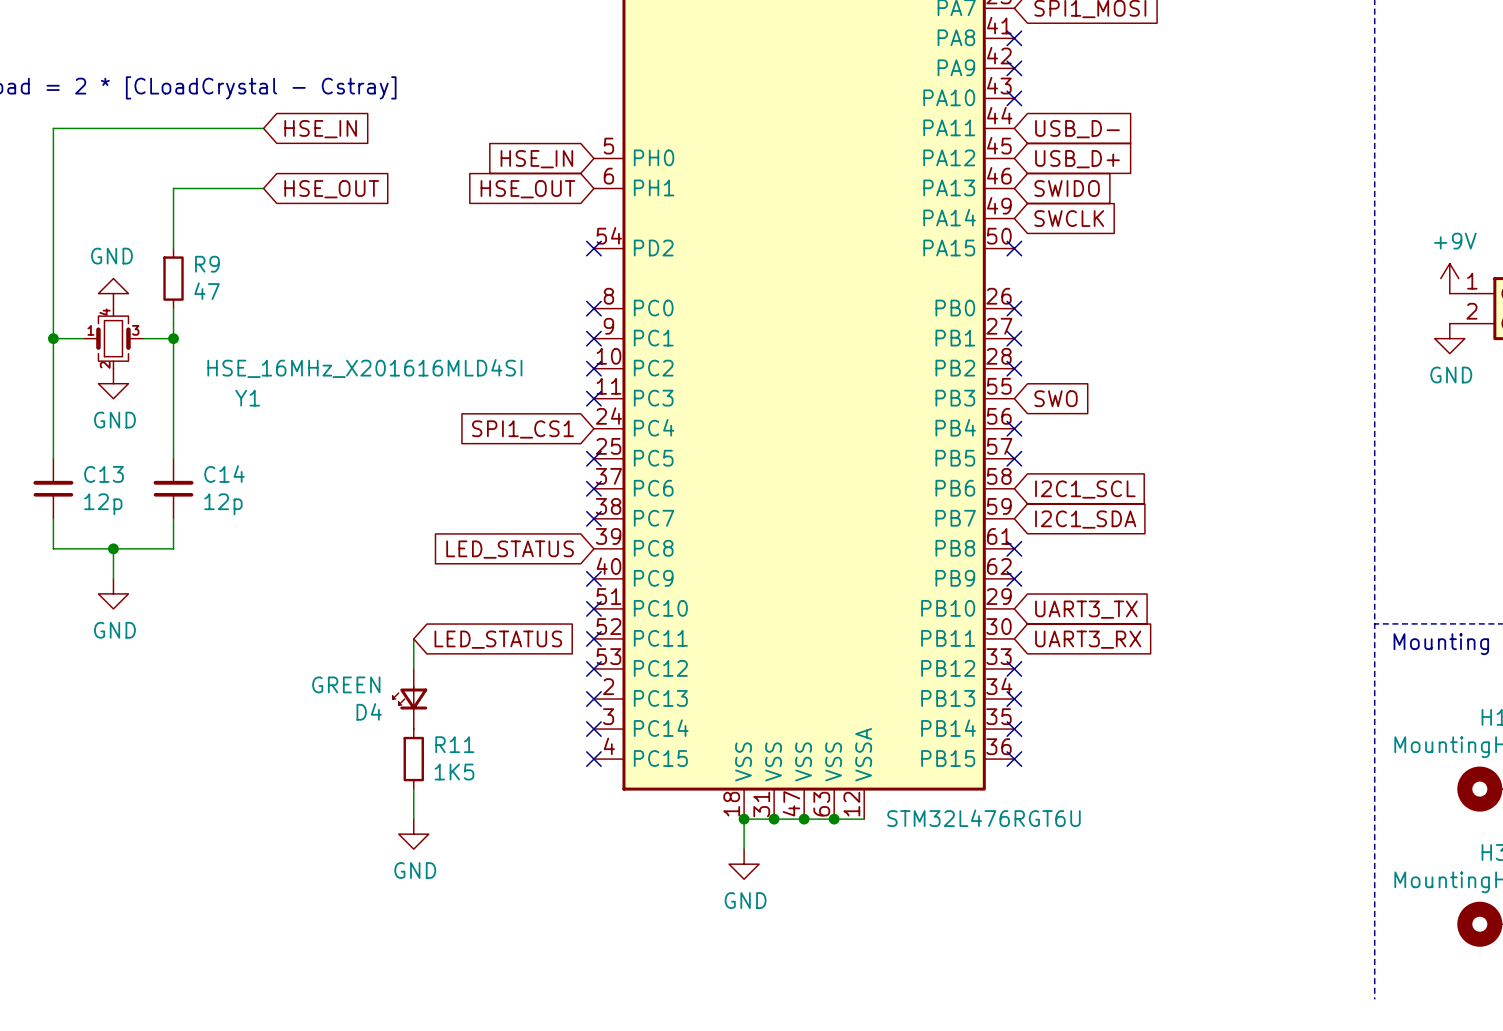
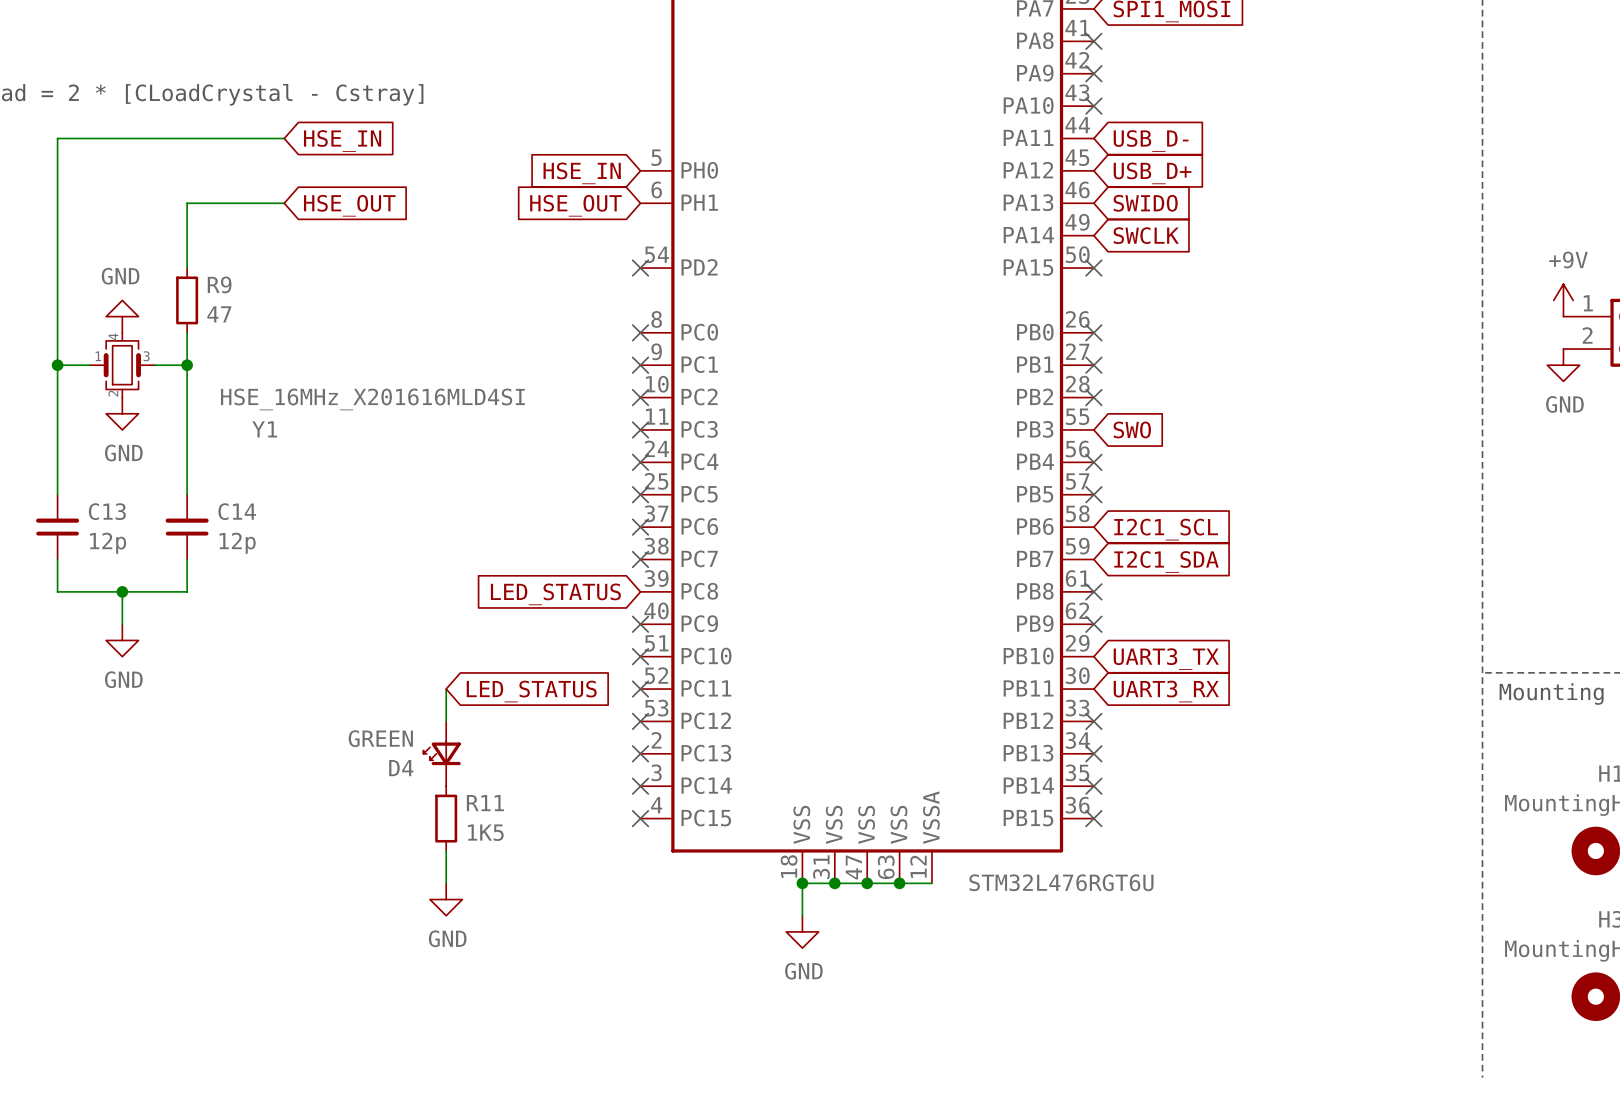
no-connect mark: none -> (640, 462)
global label: SPI1_CS1 (522, 429) -> none

